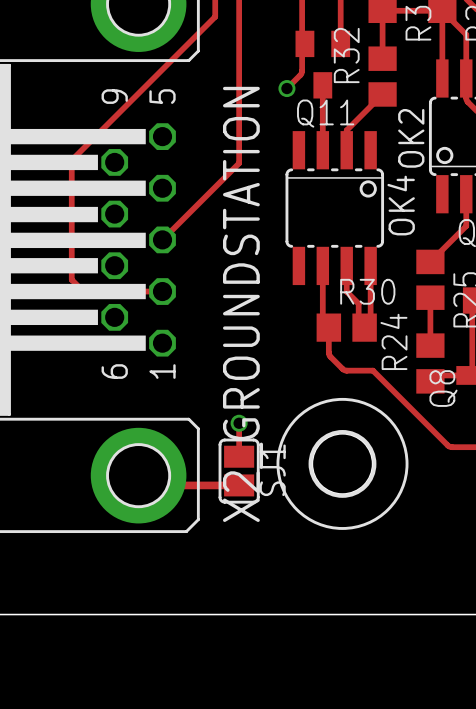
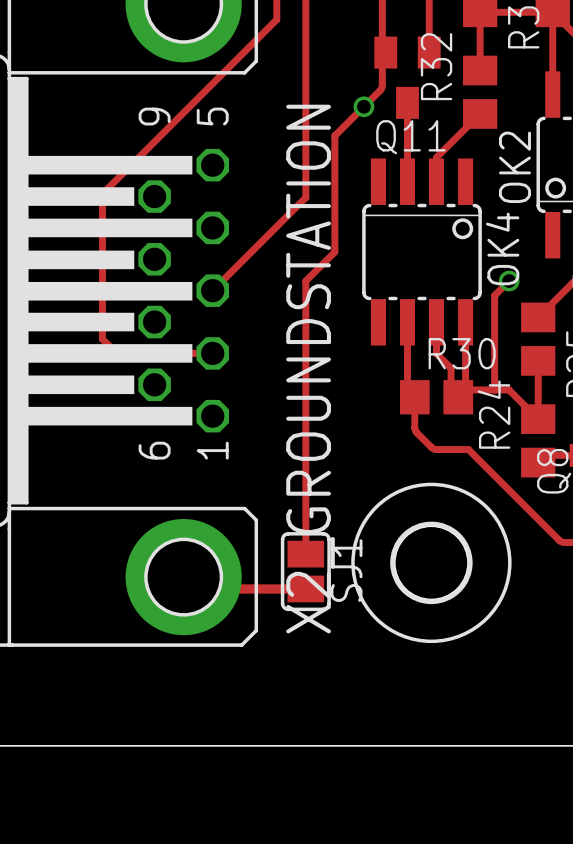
track: none -> (363, 106) (334, 135) (334, 252) (305, 281) (305, 513)
track: none -> (509, 281) (494, 295) (494, 389)
via: none -> (509, 281)
track: none -> (465, 389) (509, 389) (538, 419)
via: (239, 423) -> none

